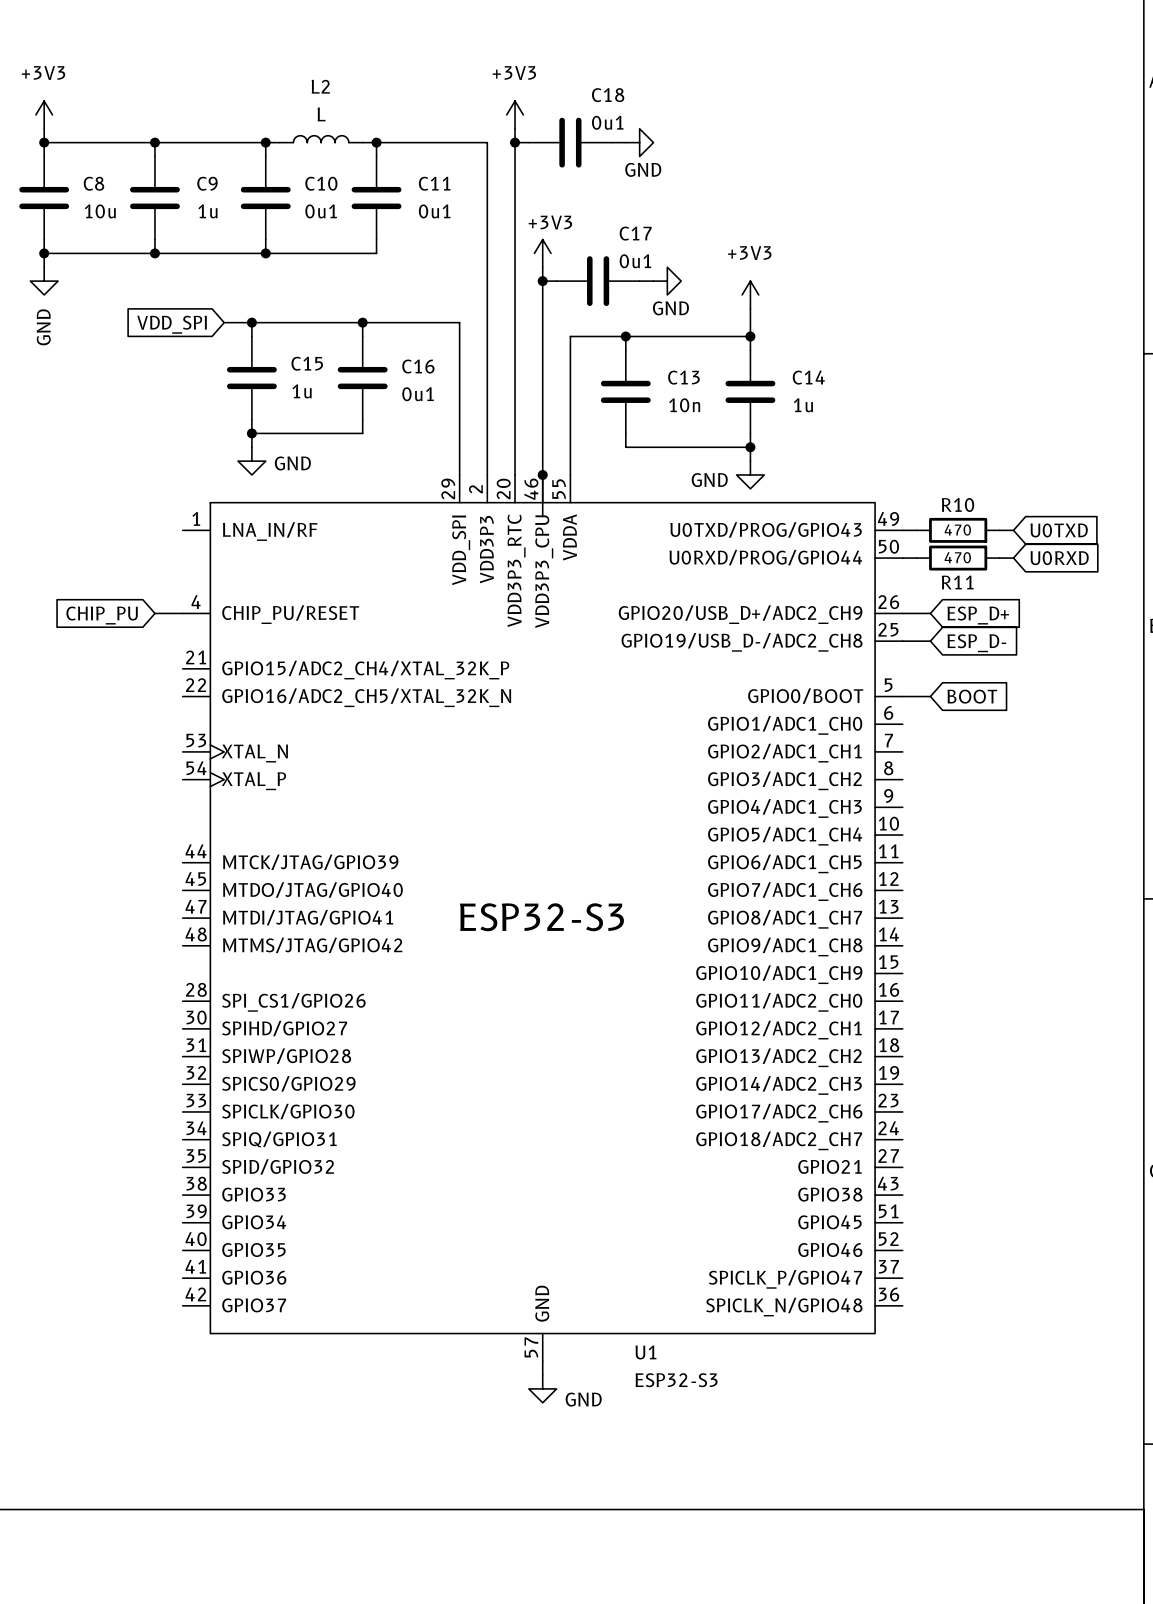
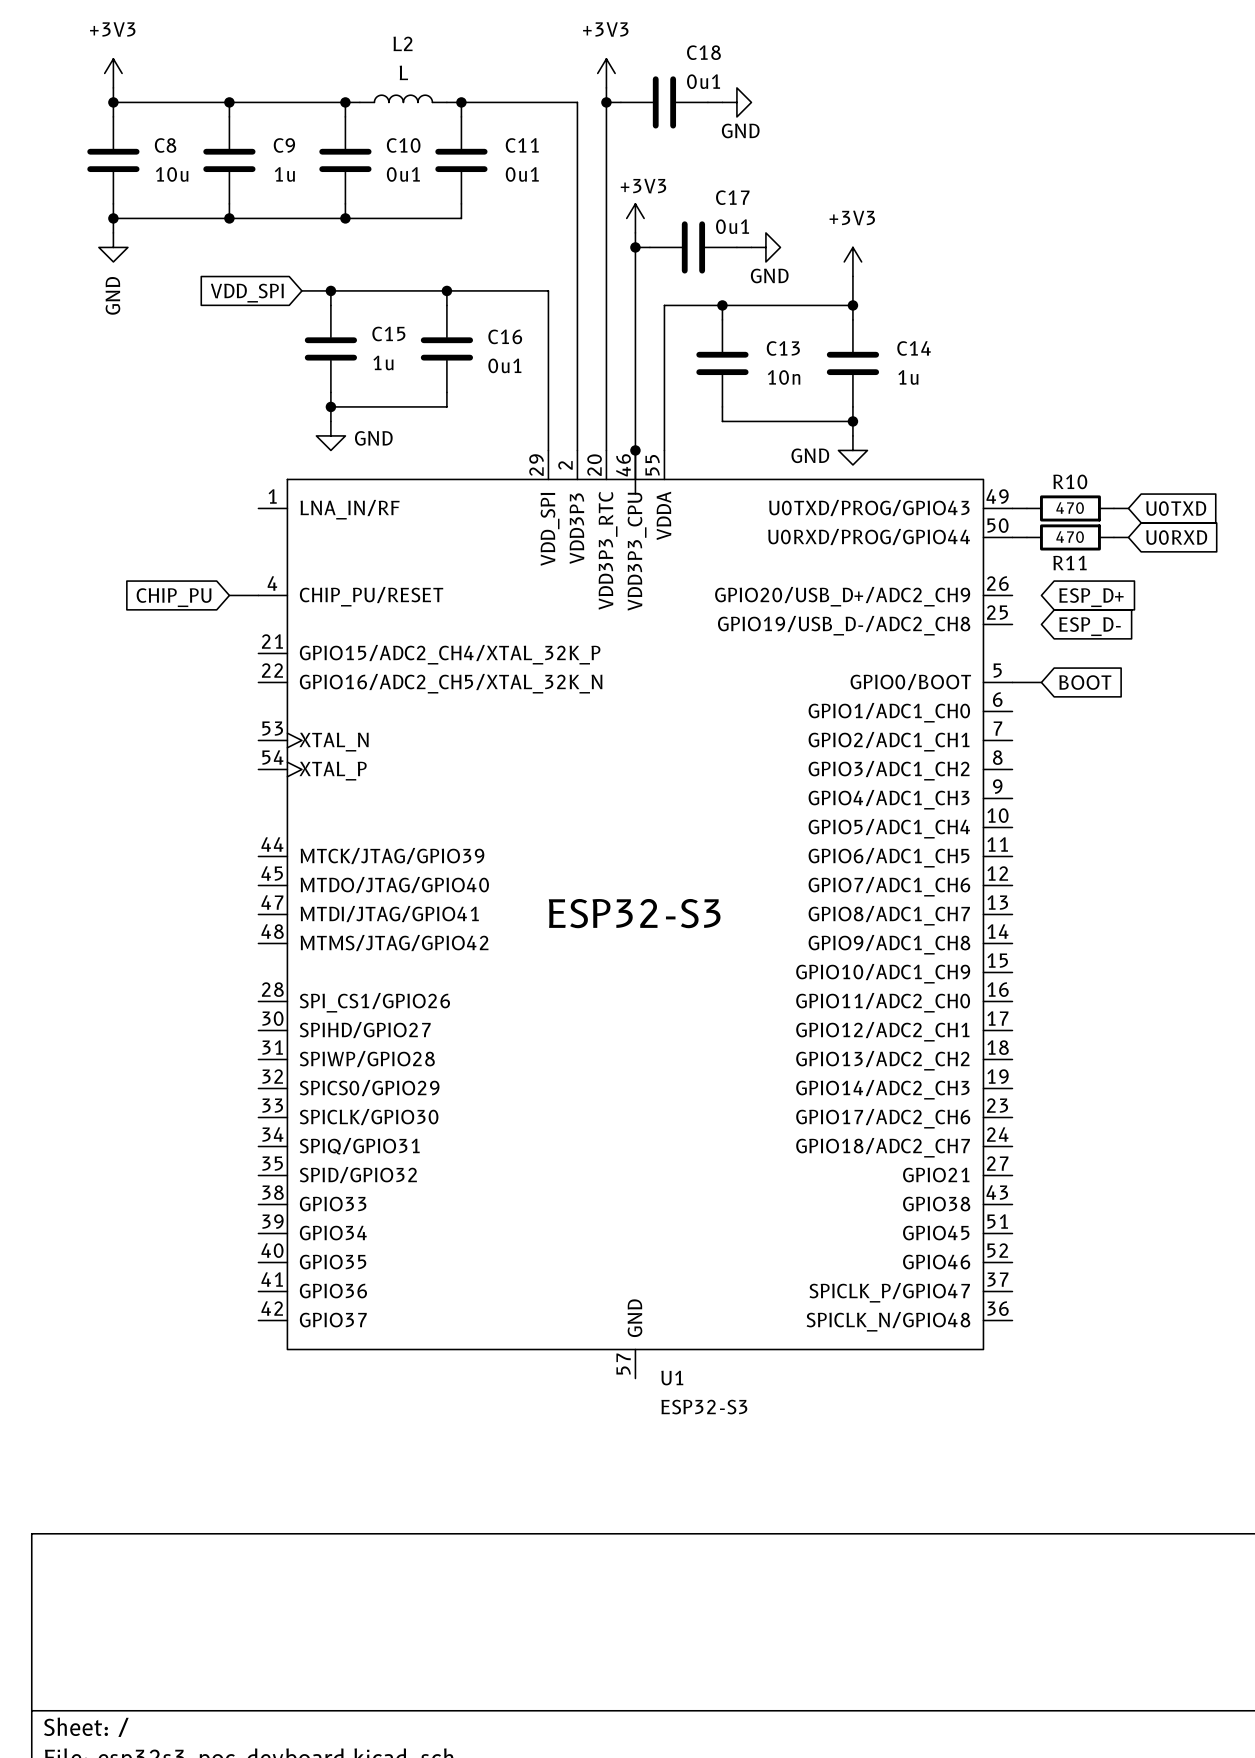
wire: (902, 613) (930, 613) -> none
wire: (902, 641) (930, 641) -> none
U1 name position: U1 (645, 1352) -> U1 (672, 1378)
wire: (542, 1361) (542, 1375) -> none
U1 value position: ESP32-S3 (676, 1380) -> ESP32-S3 (704, 1407)
power symbol: GND (542, 1388) -> none

